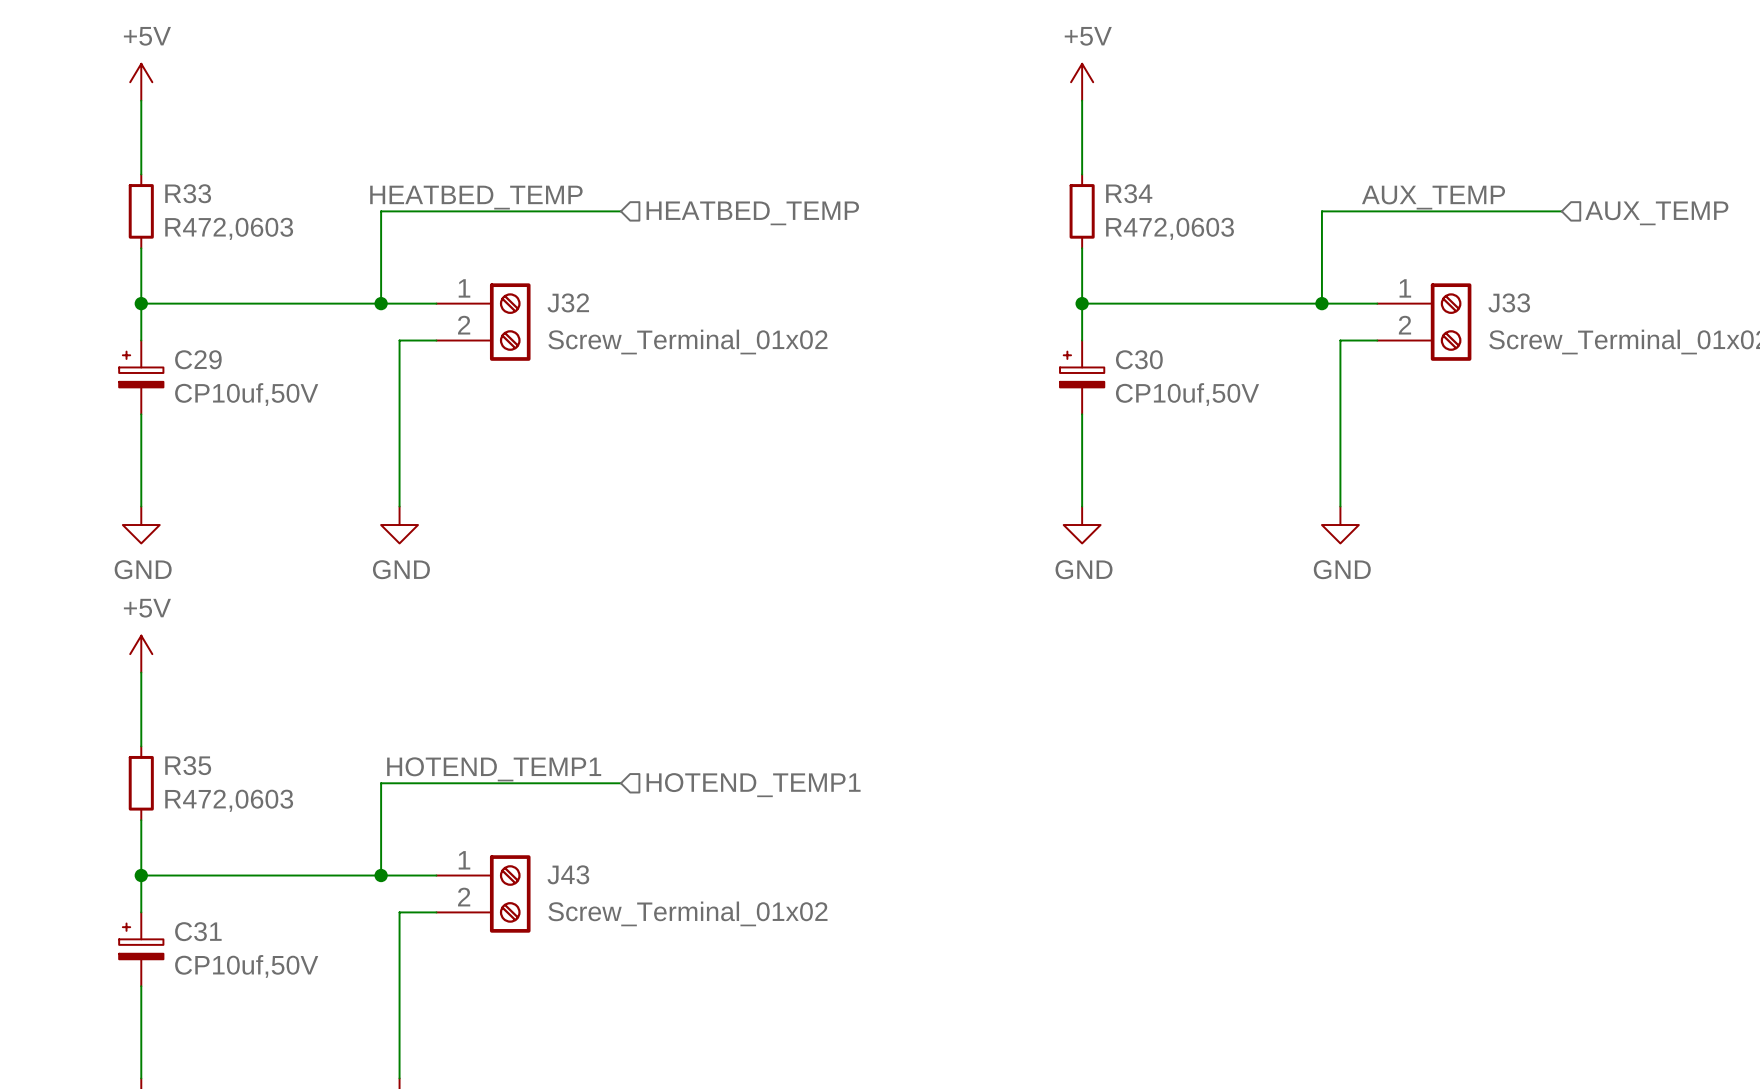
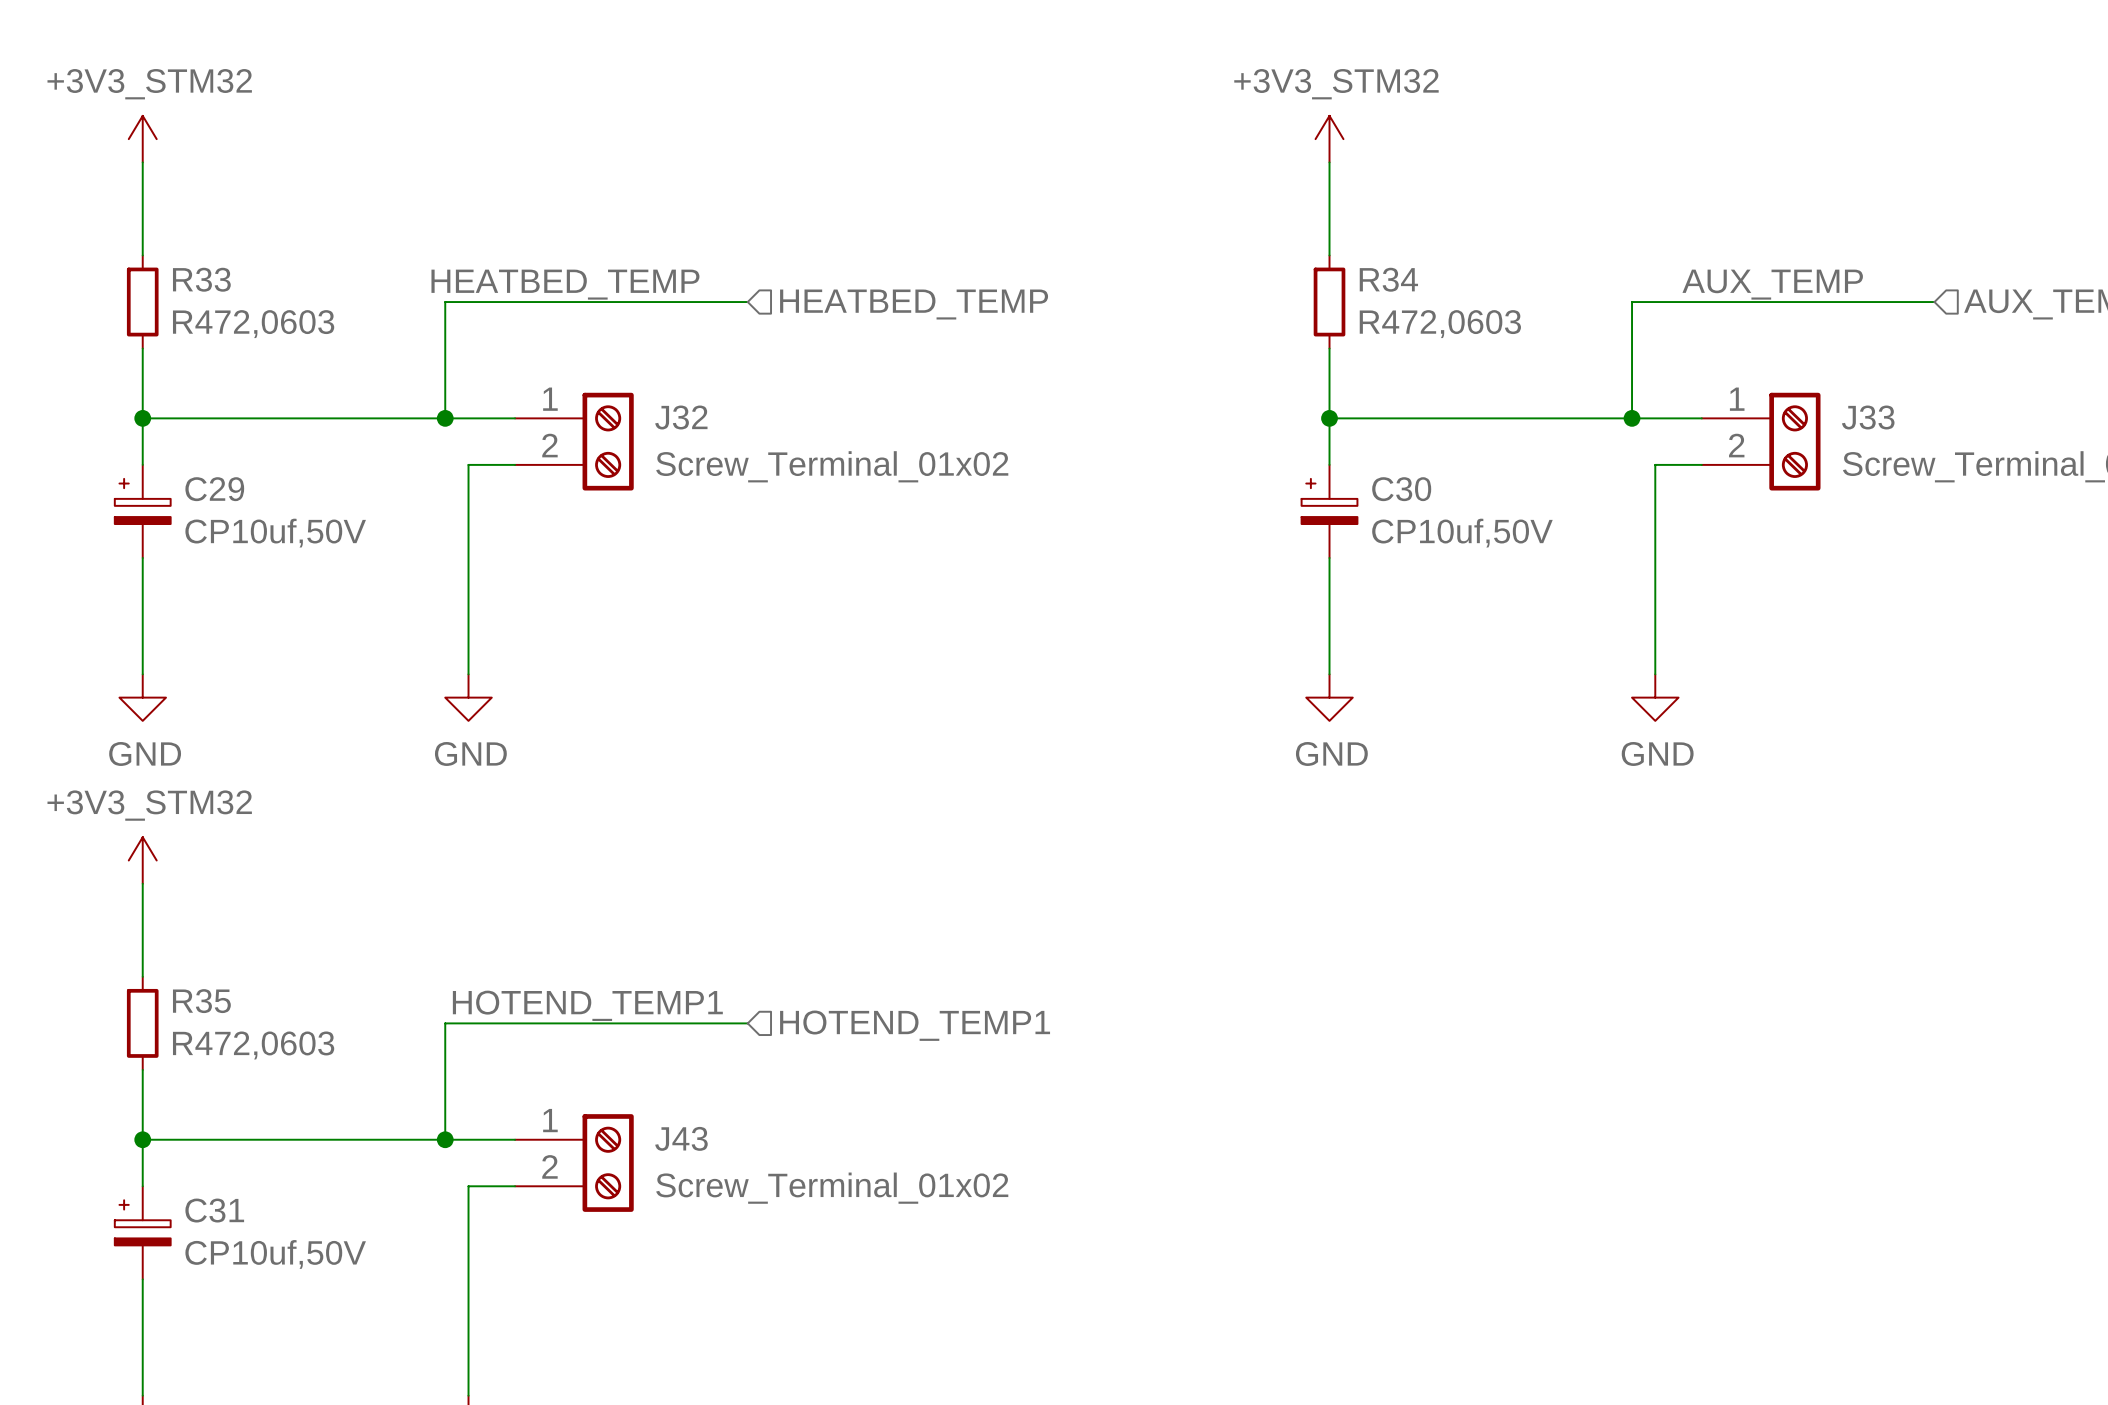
power symbol: +5V (141, 82) -> +3V3_STM32 (142, 139)
power symbol: +5V (1082, 82) -> +3V3_STM32 (1329, 139)
power symbol: +5V (141, 654) -> +3V3_STM32 (142, 860)

